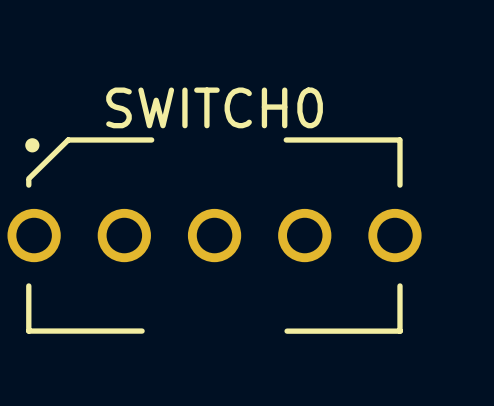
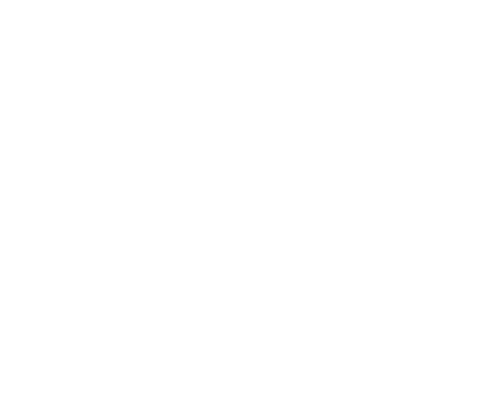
SWITCH0: (214, 235) -> none

